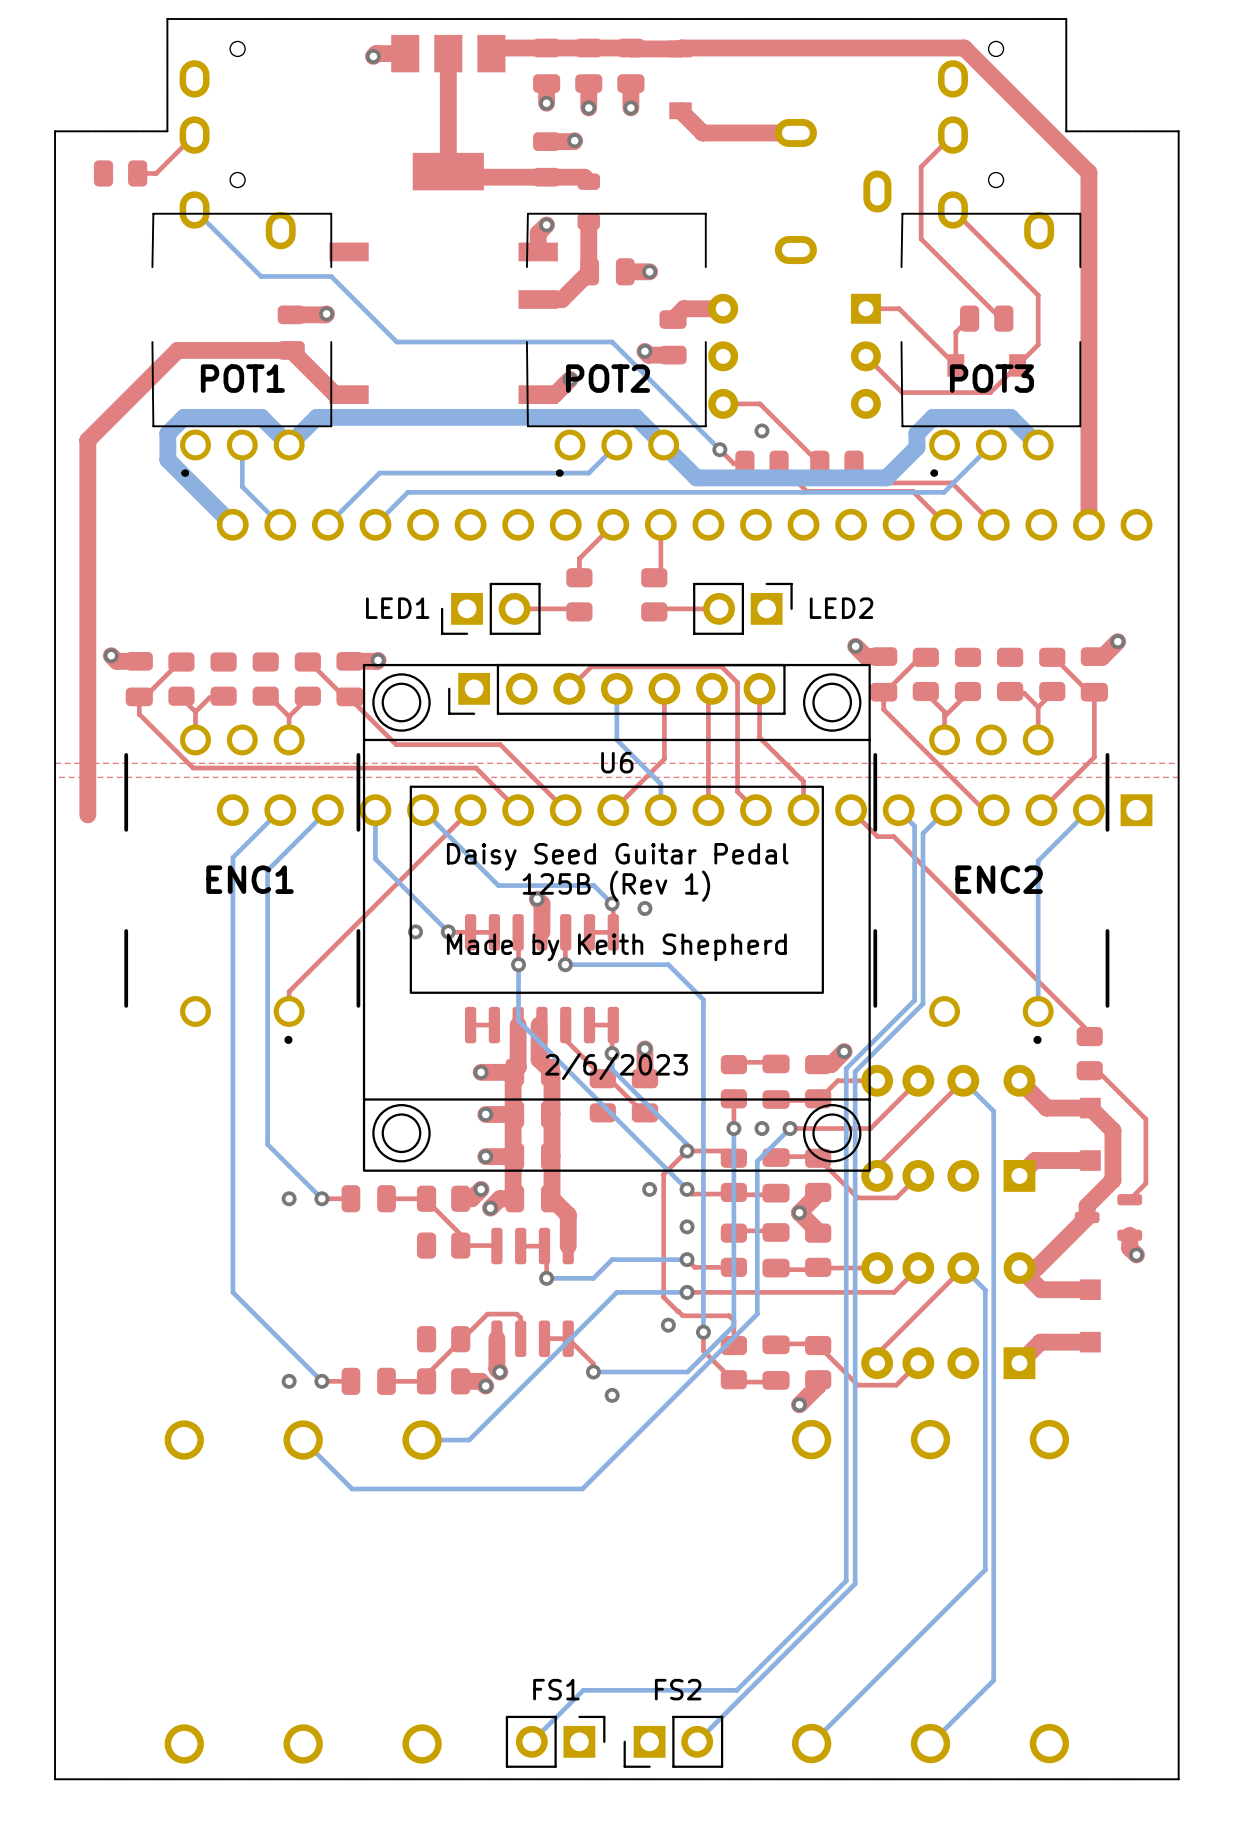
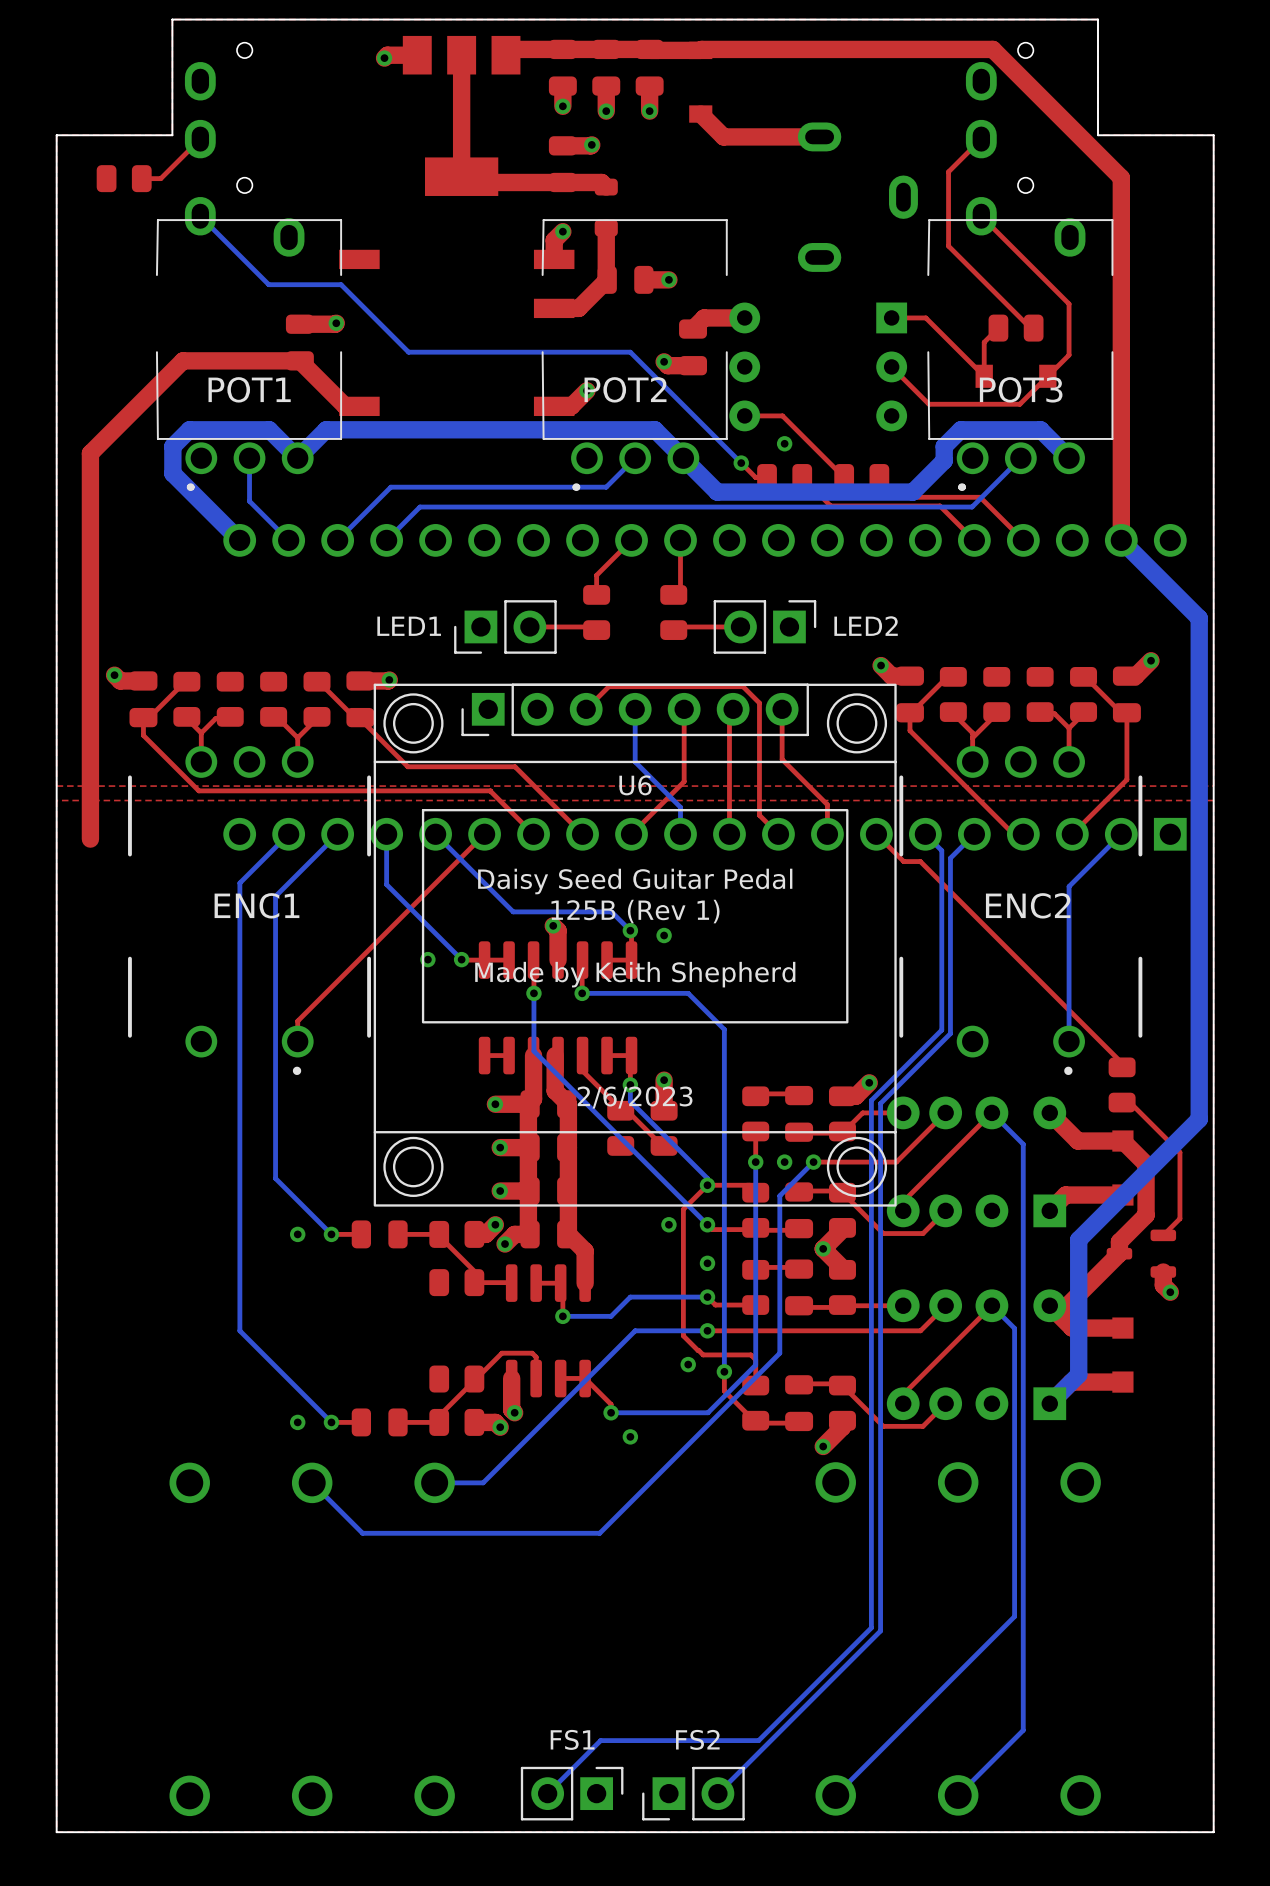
bottom track: none -> (1121, 540) (1199, 618) (1199, 1119) (1078, 1239) (1078, 1374) (1049, 1403)

